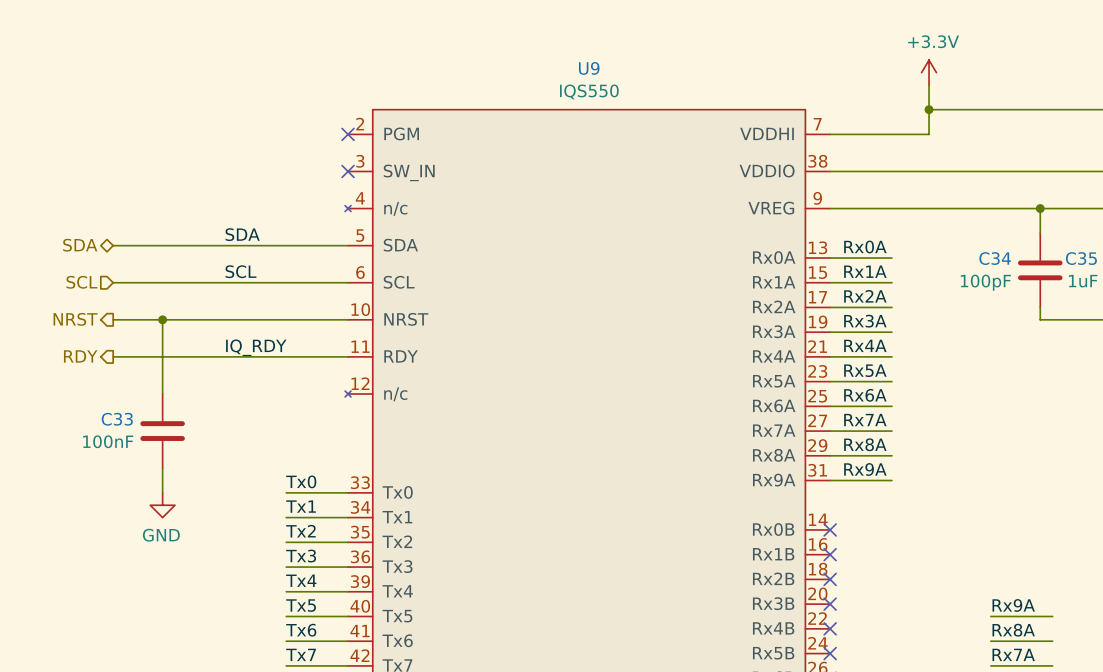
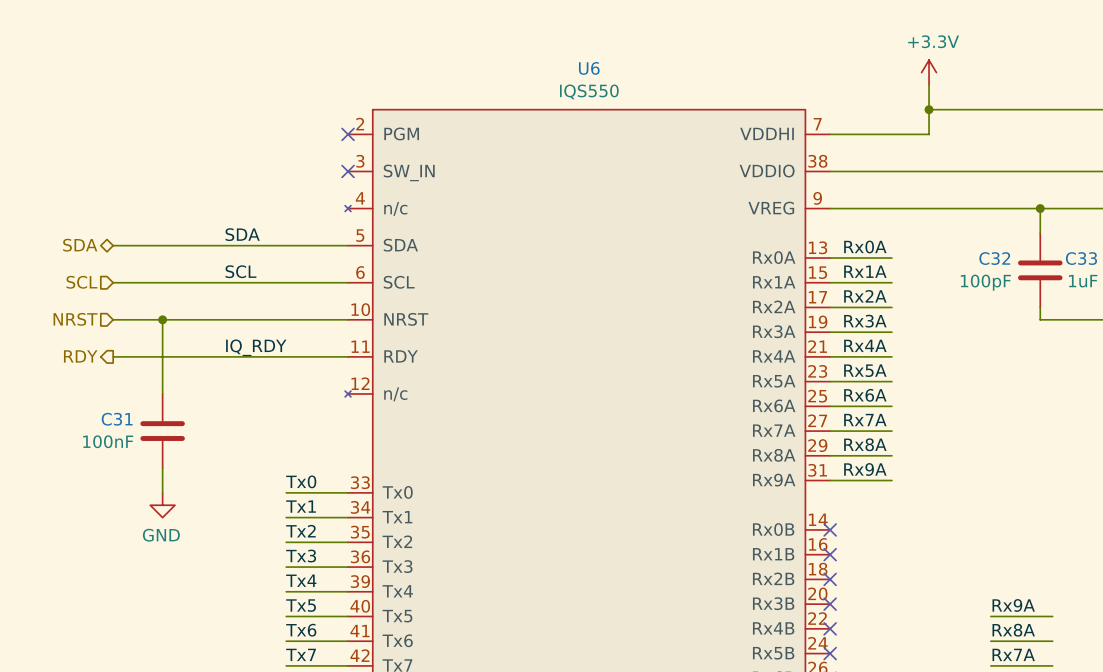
U9 name: U9 (589, 68) -> U6 (589, 68)
C34 name: C34 (995, 258) -> C32 (994, 258)
C35 name: C35 (1081, 258) -> C33 (1081, 258)
hierarchical label shape: output (75, 319) -> input (75, 319)
C33 name: C33 (117, 419) -> C31 (117, 419)

